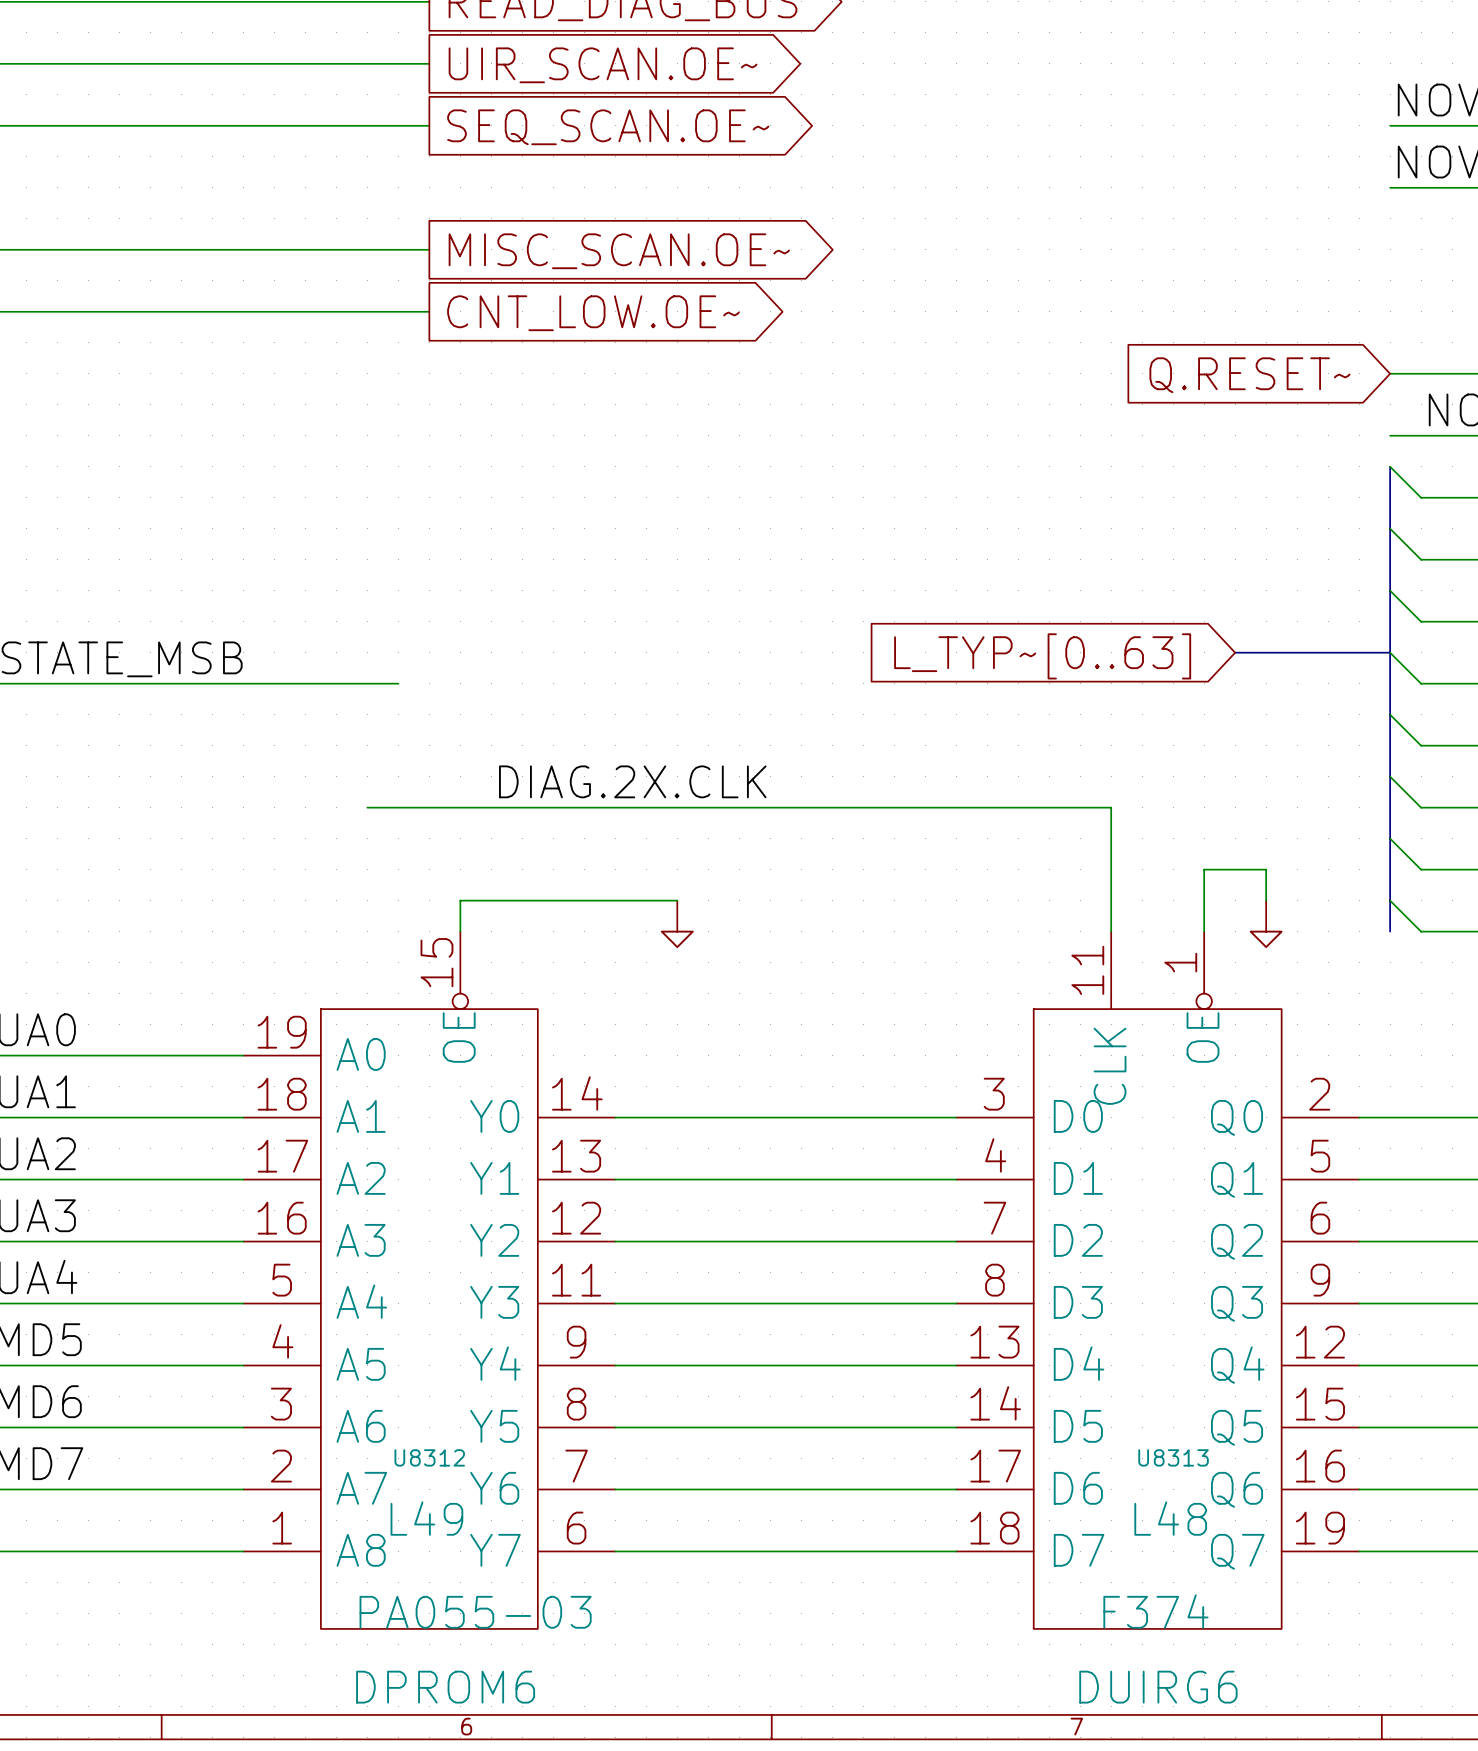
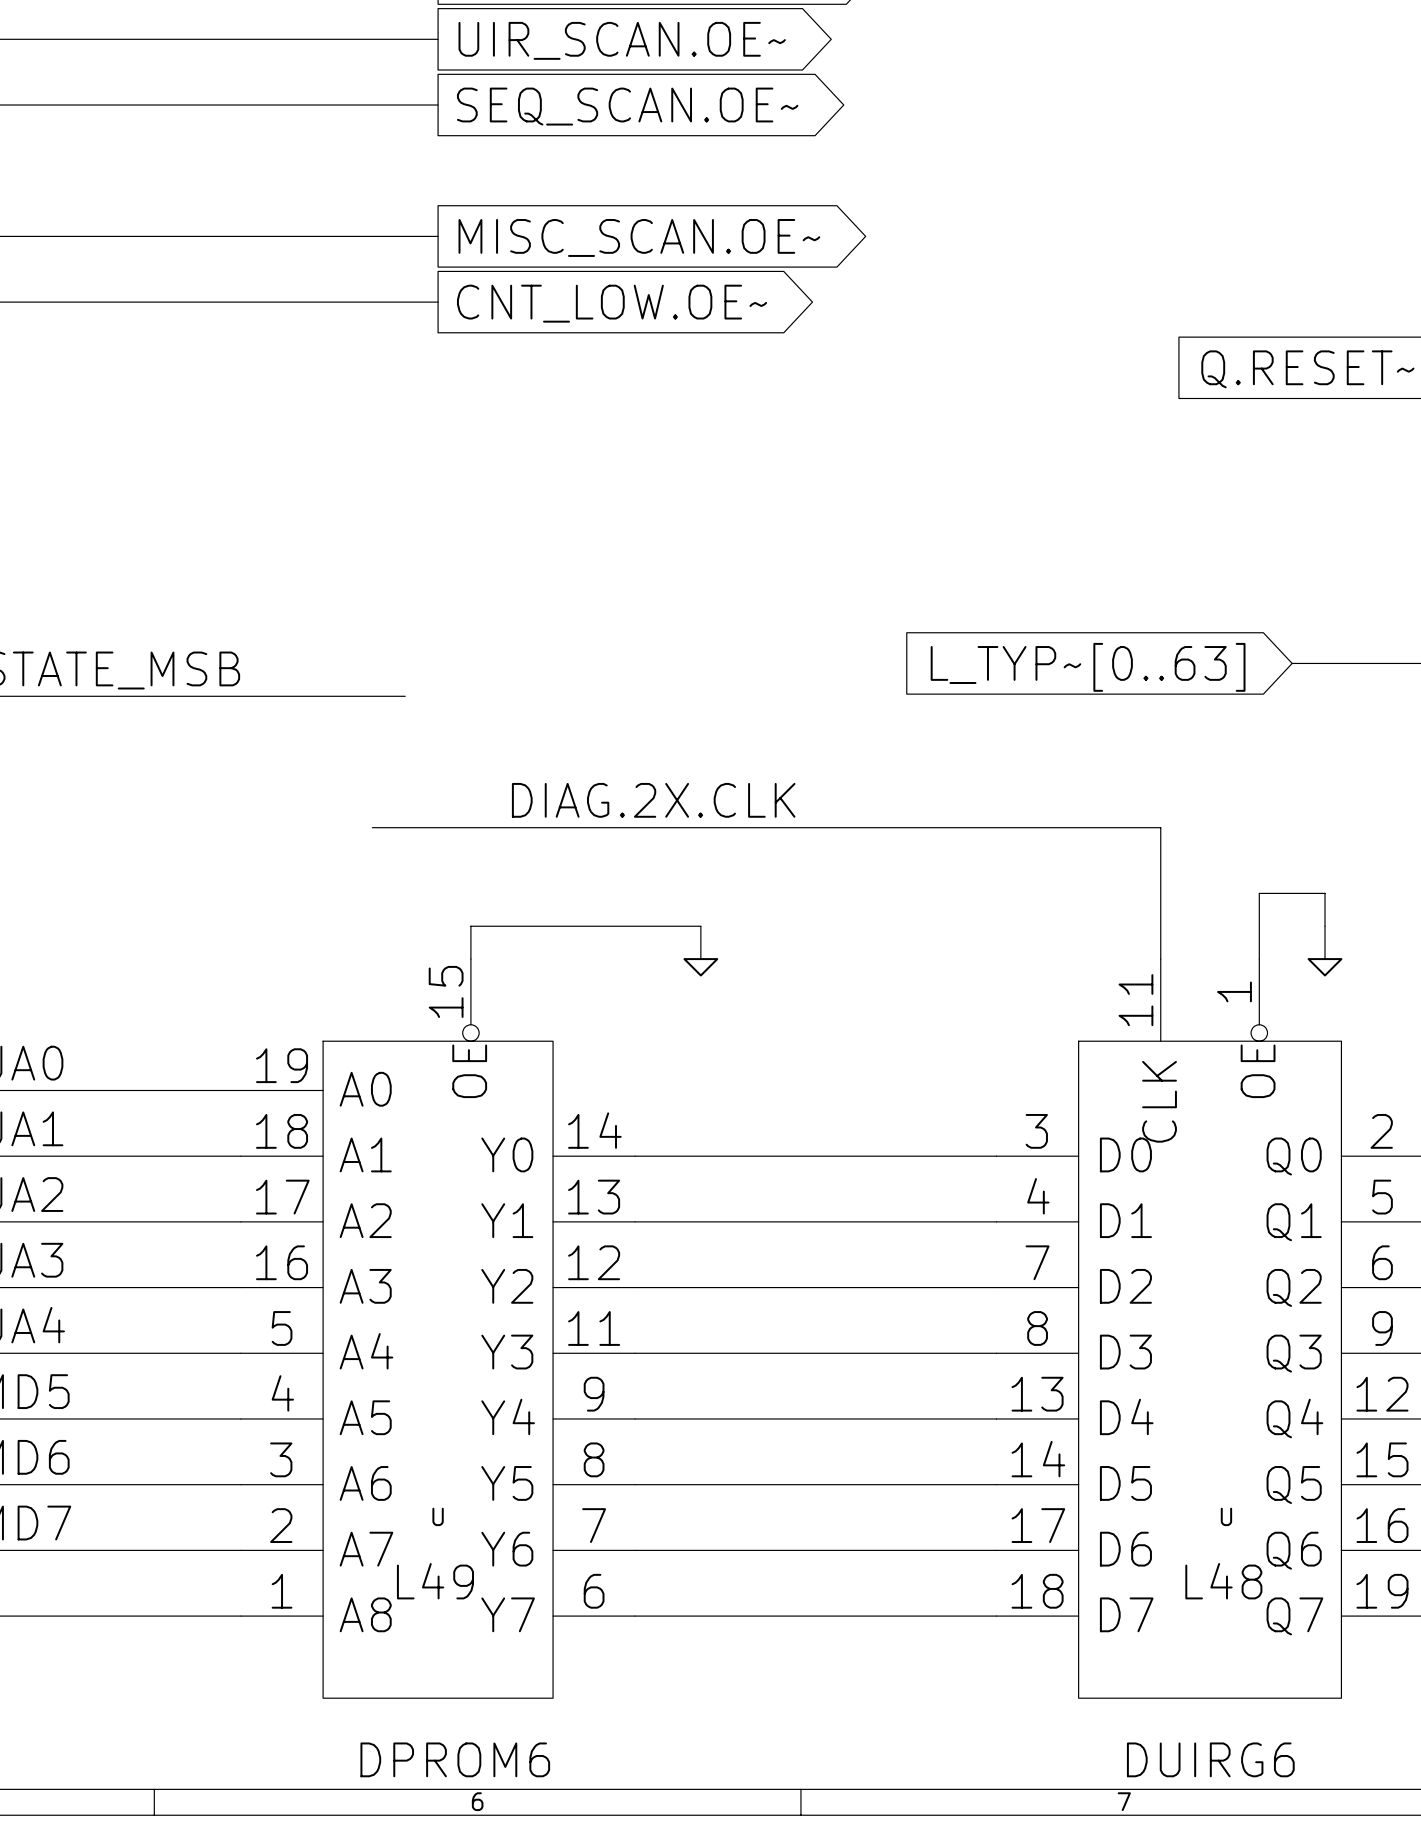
U8312 name: U8312 (429, 1457) -> U (438, 1516)
U8313 name: U8313 (1173, 1457) -> U (1226, 1516)
U8313 value: F374 (1155, 1611) -> none
U8312 value: PA055-03 (475, 1612) -> none

